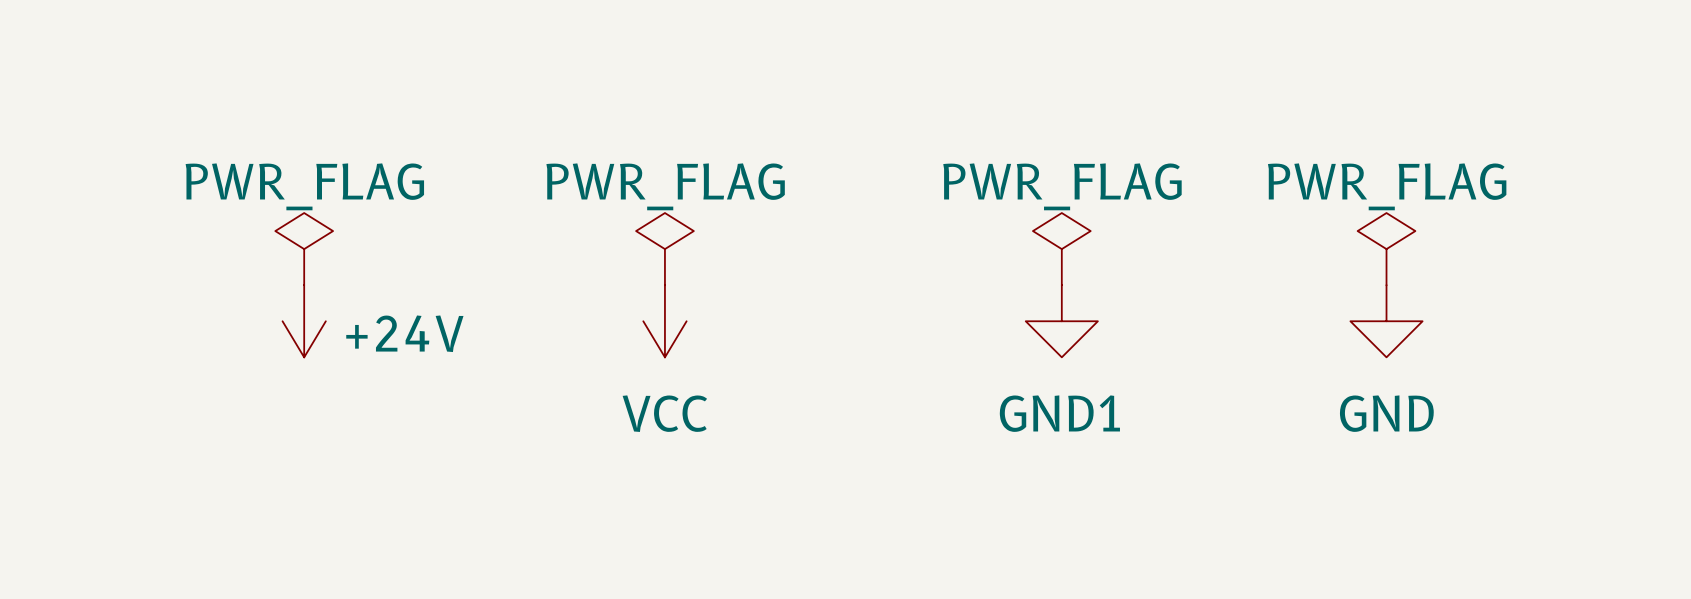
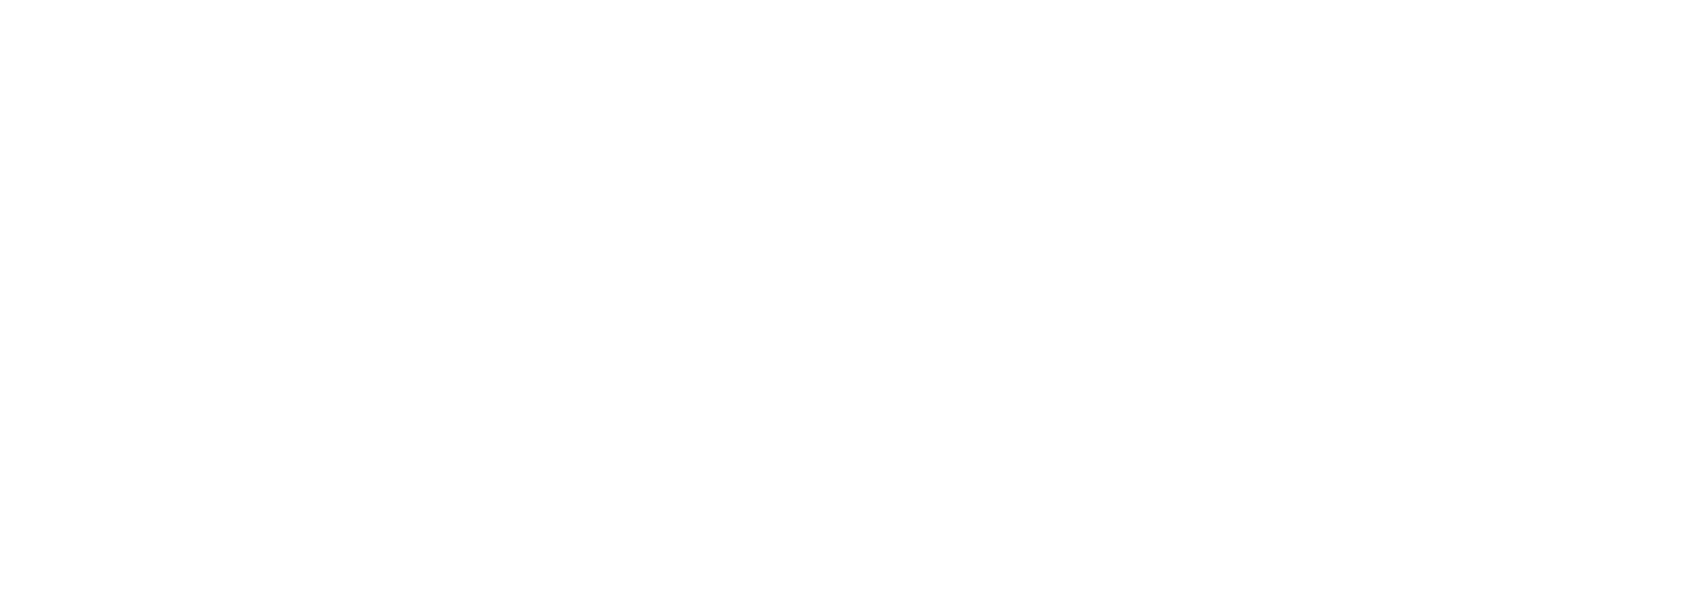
power symbol: PWR_FLAG (304, 249) -> none
power symbol: PWR_FLAG (664, 249) -> none
power symbol: PWR_FLAG (1061, 249) -> none
power symbol: PWR_FLAG (1386, 249) -> none
power symbol: +24V (304, 321) -> none
power symbol: VCC (664, 321) -> none
power symbol: GND1 (1061, 321) -> none
power symbol: GND (1386, 321) -> none

